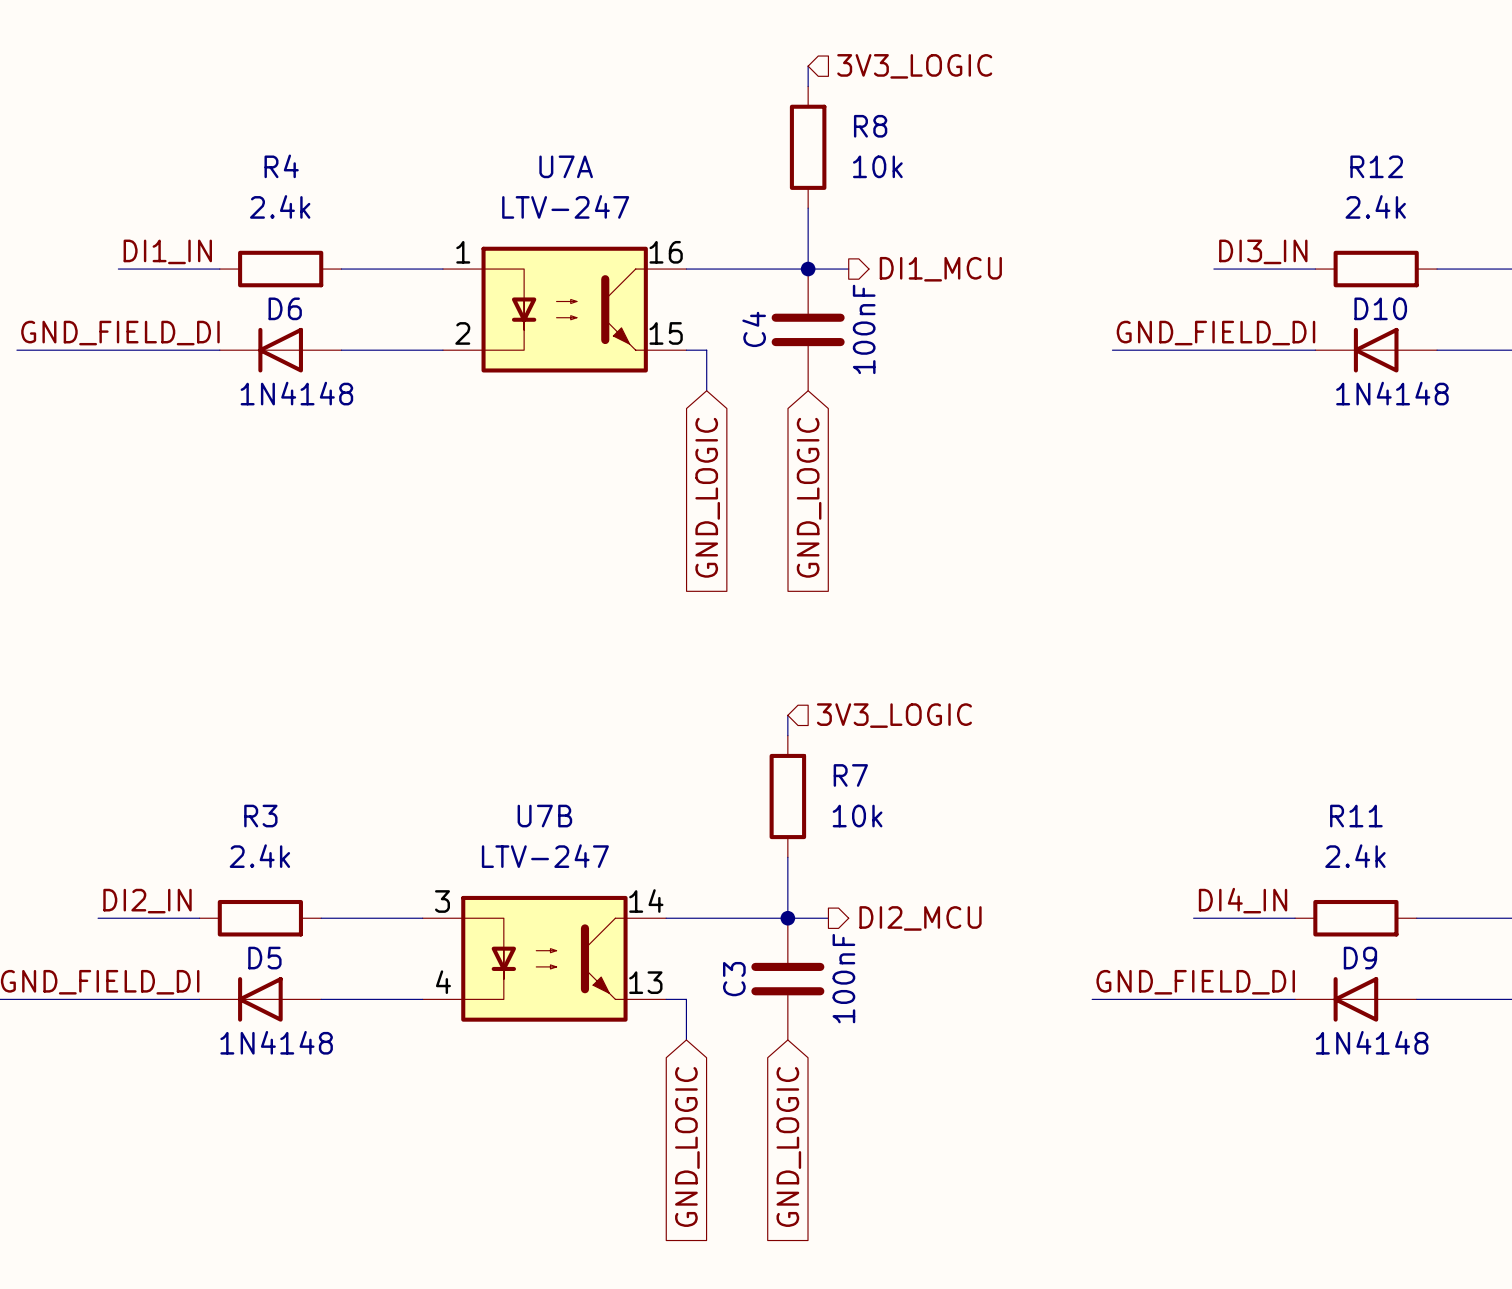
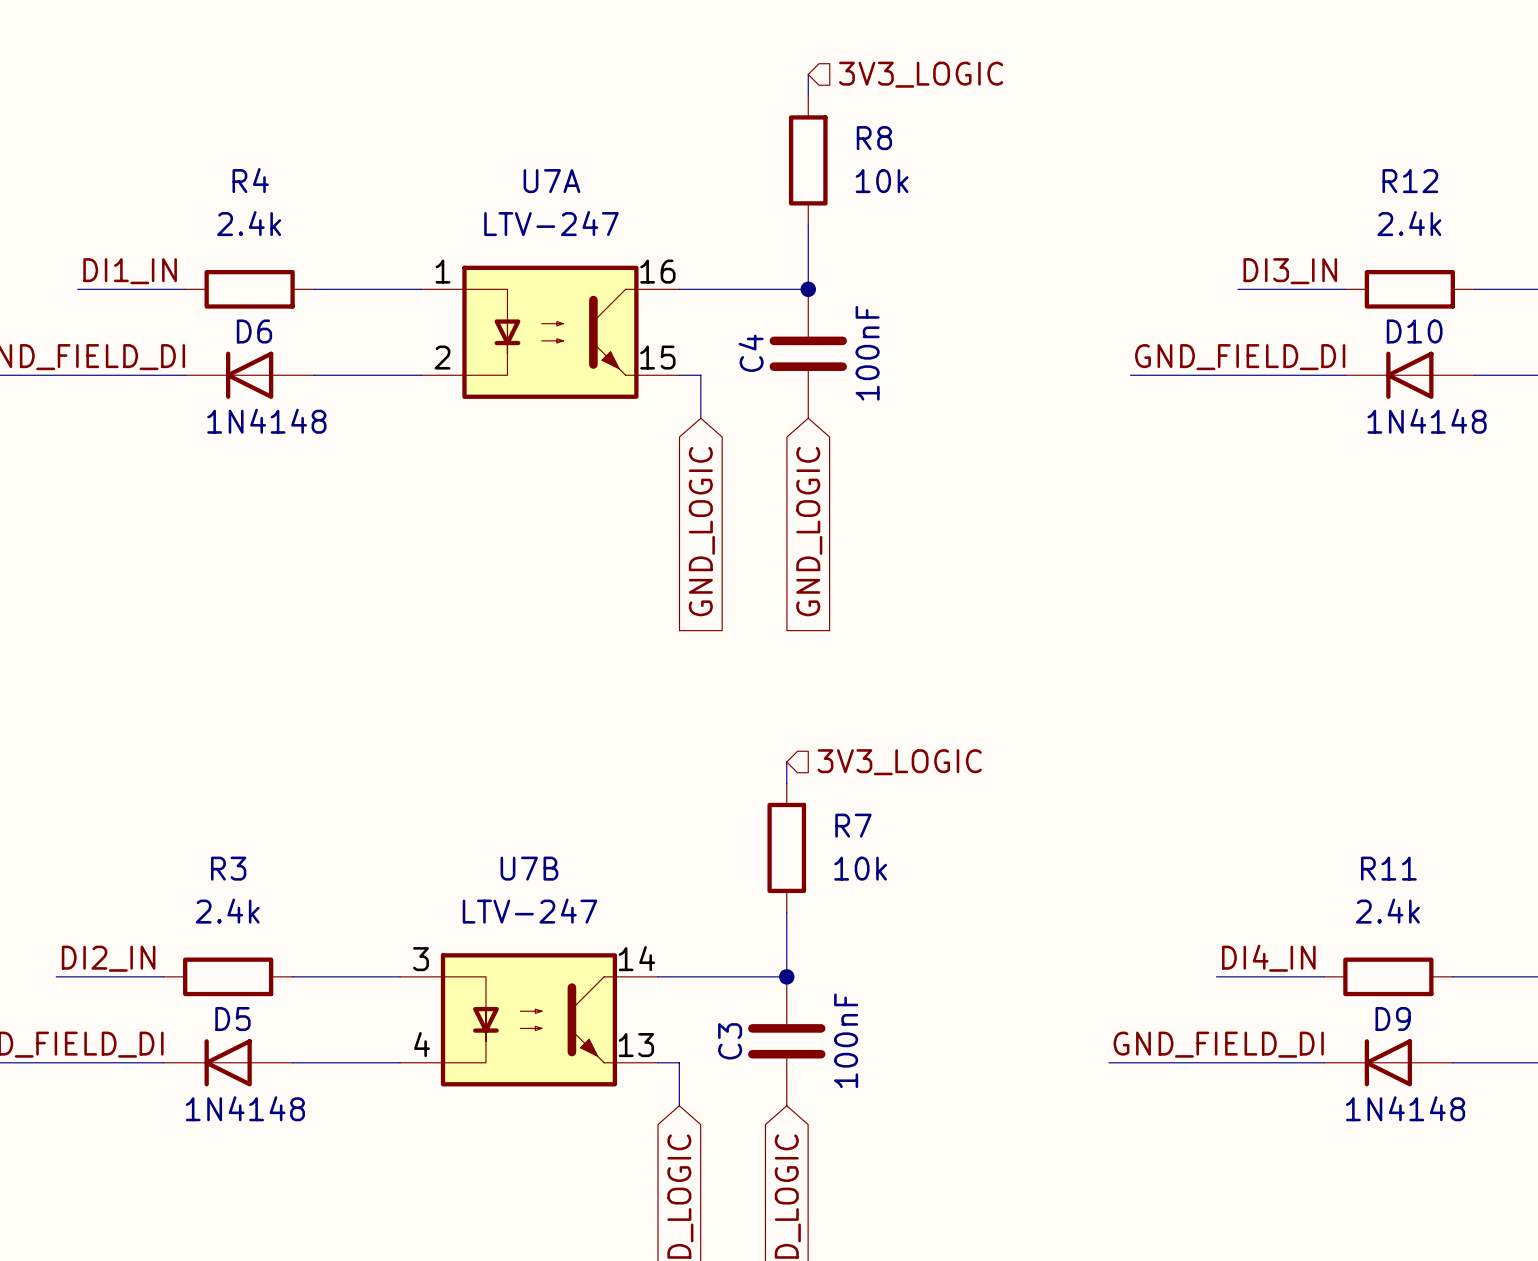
wire: (808, 269) (848, 269) -> none
hierarchical label: DI1_MCU (940, 269) -> none
wire: (787, 918) (828, 918) -> none
hierarchical label: DI2_MCU (920, 918) -> none

